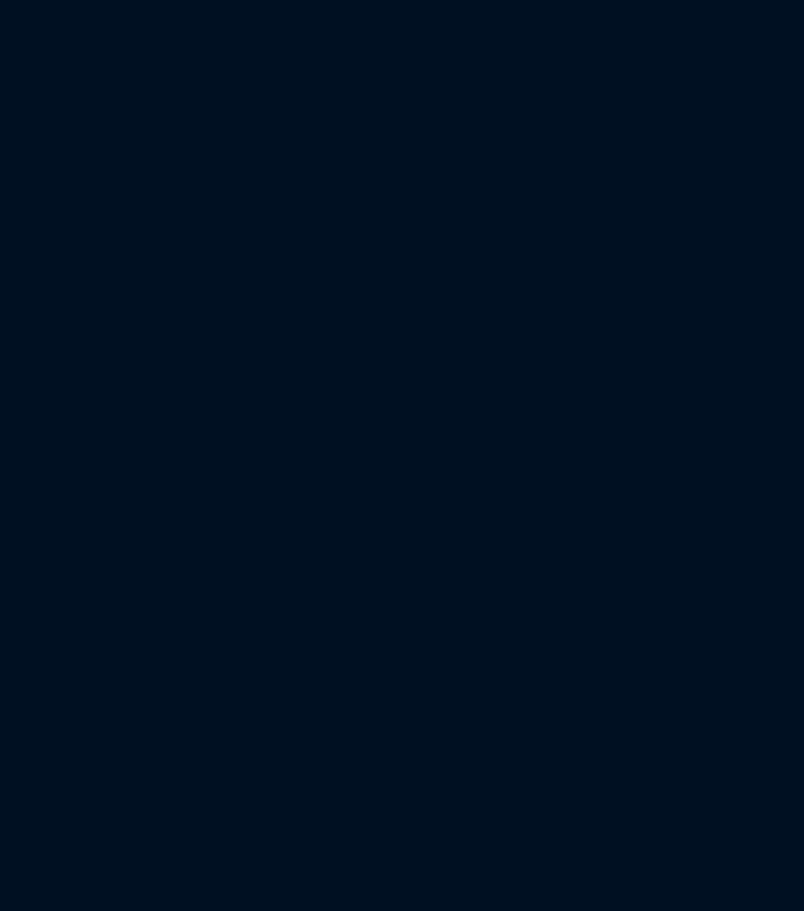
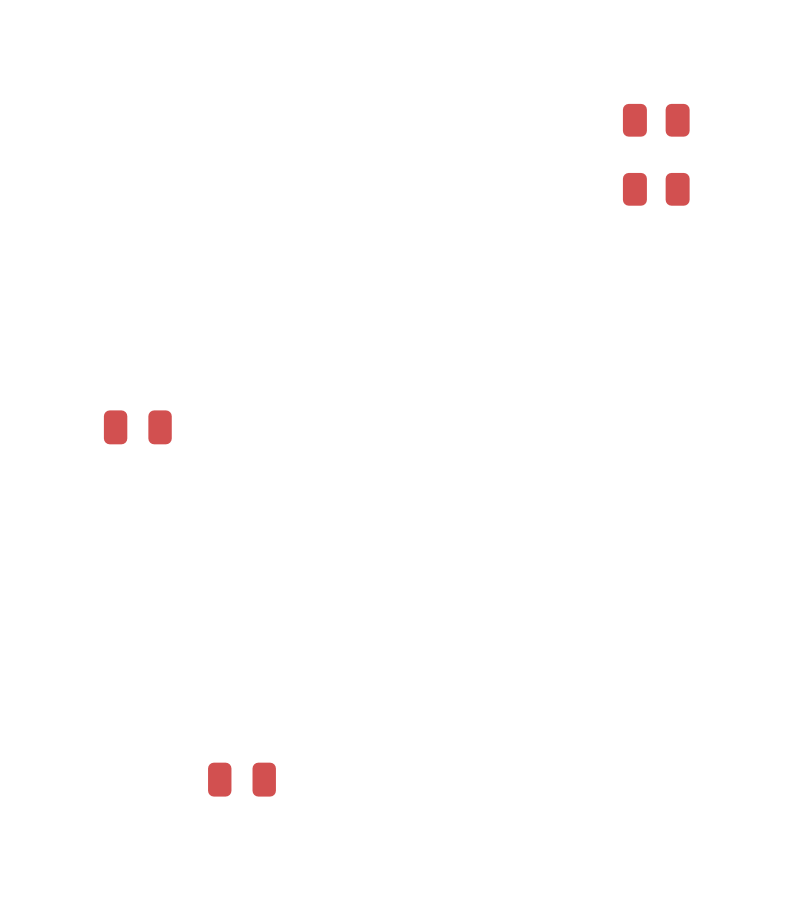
part: none -> (656, 120)
part: none -> (656, 189)
part: none -> (137, 427)
part: none -> (241, 779)

